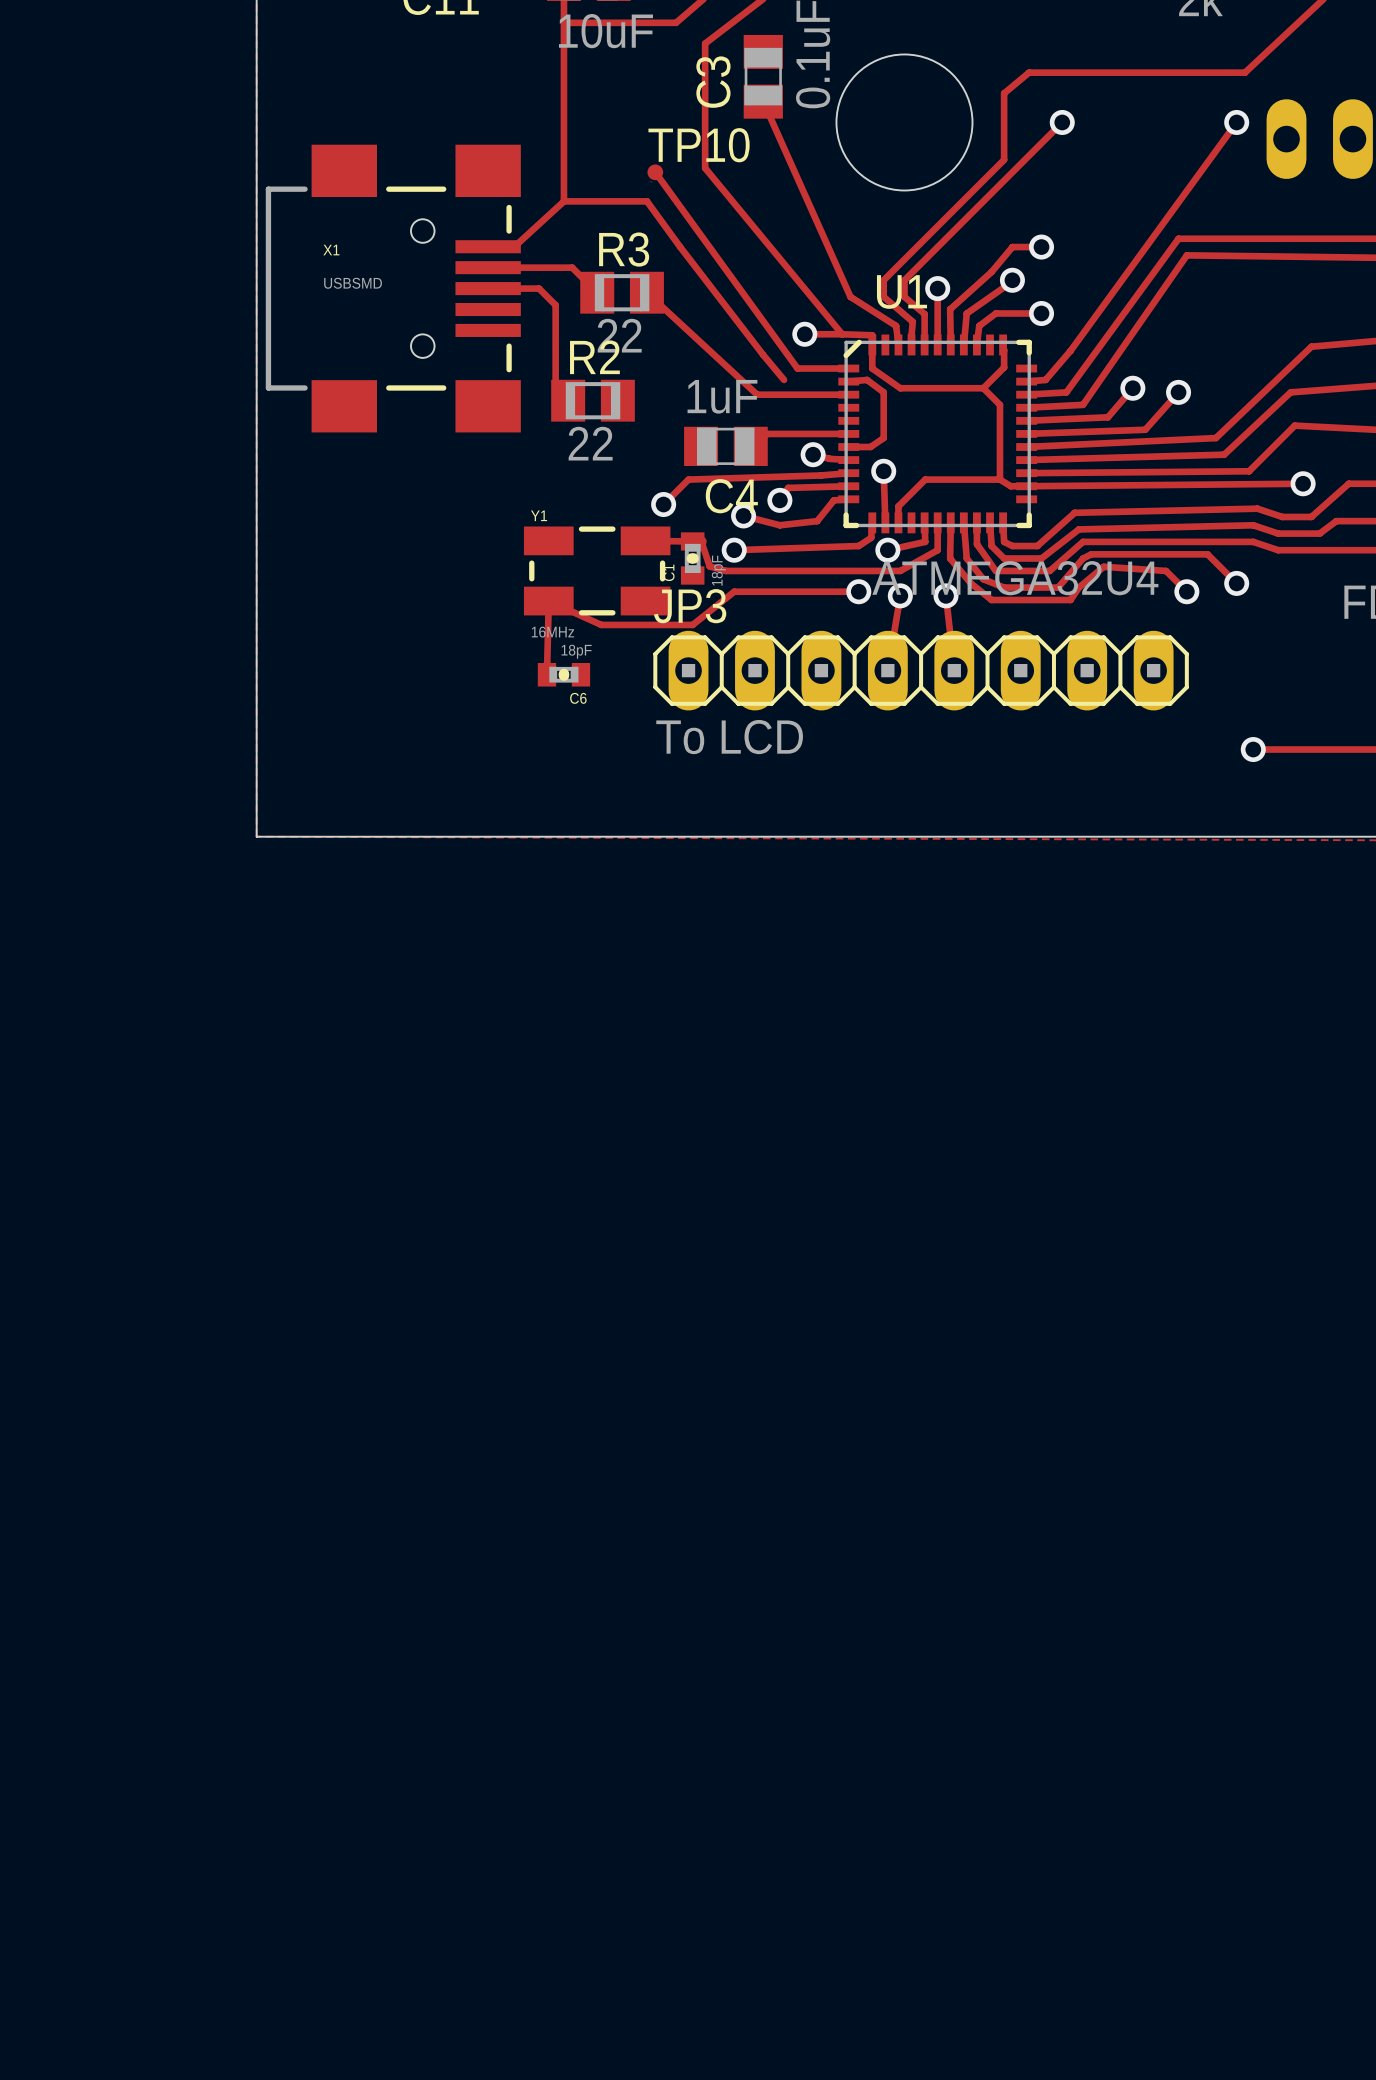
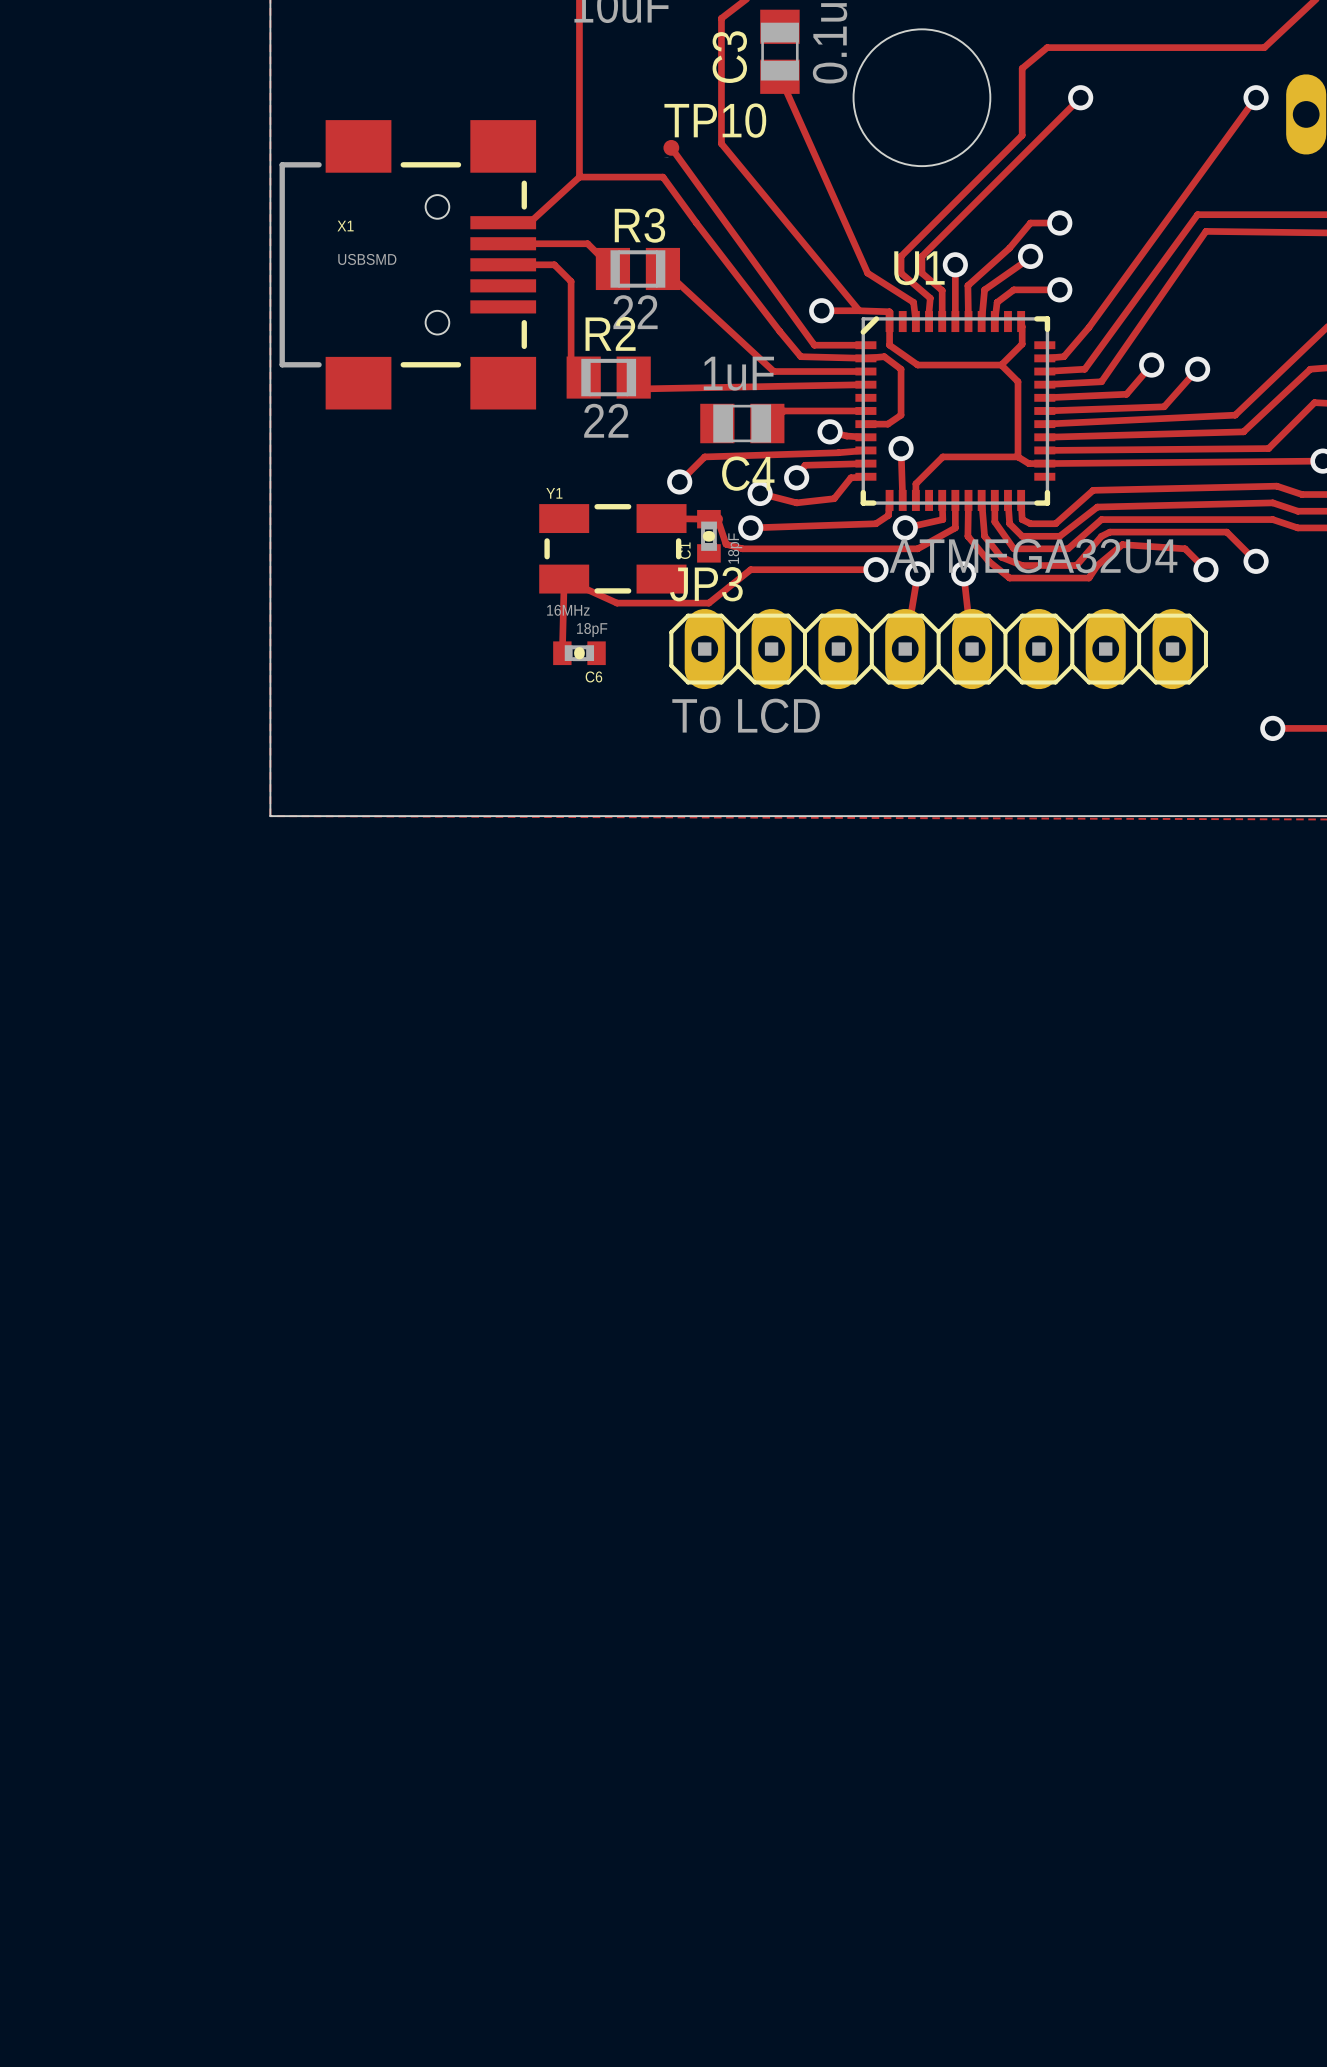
track: none -> (800, 356) (865, 358)
track: none -> (633, 377) (644, 388) (865, 384)

